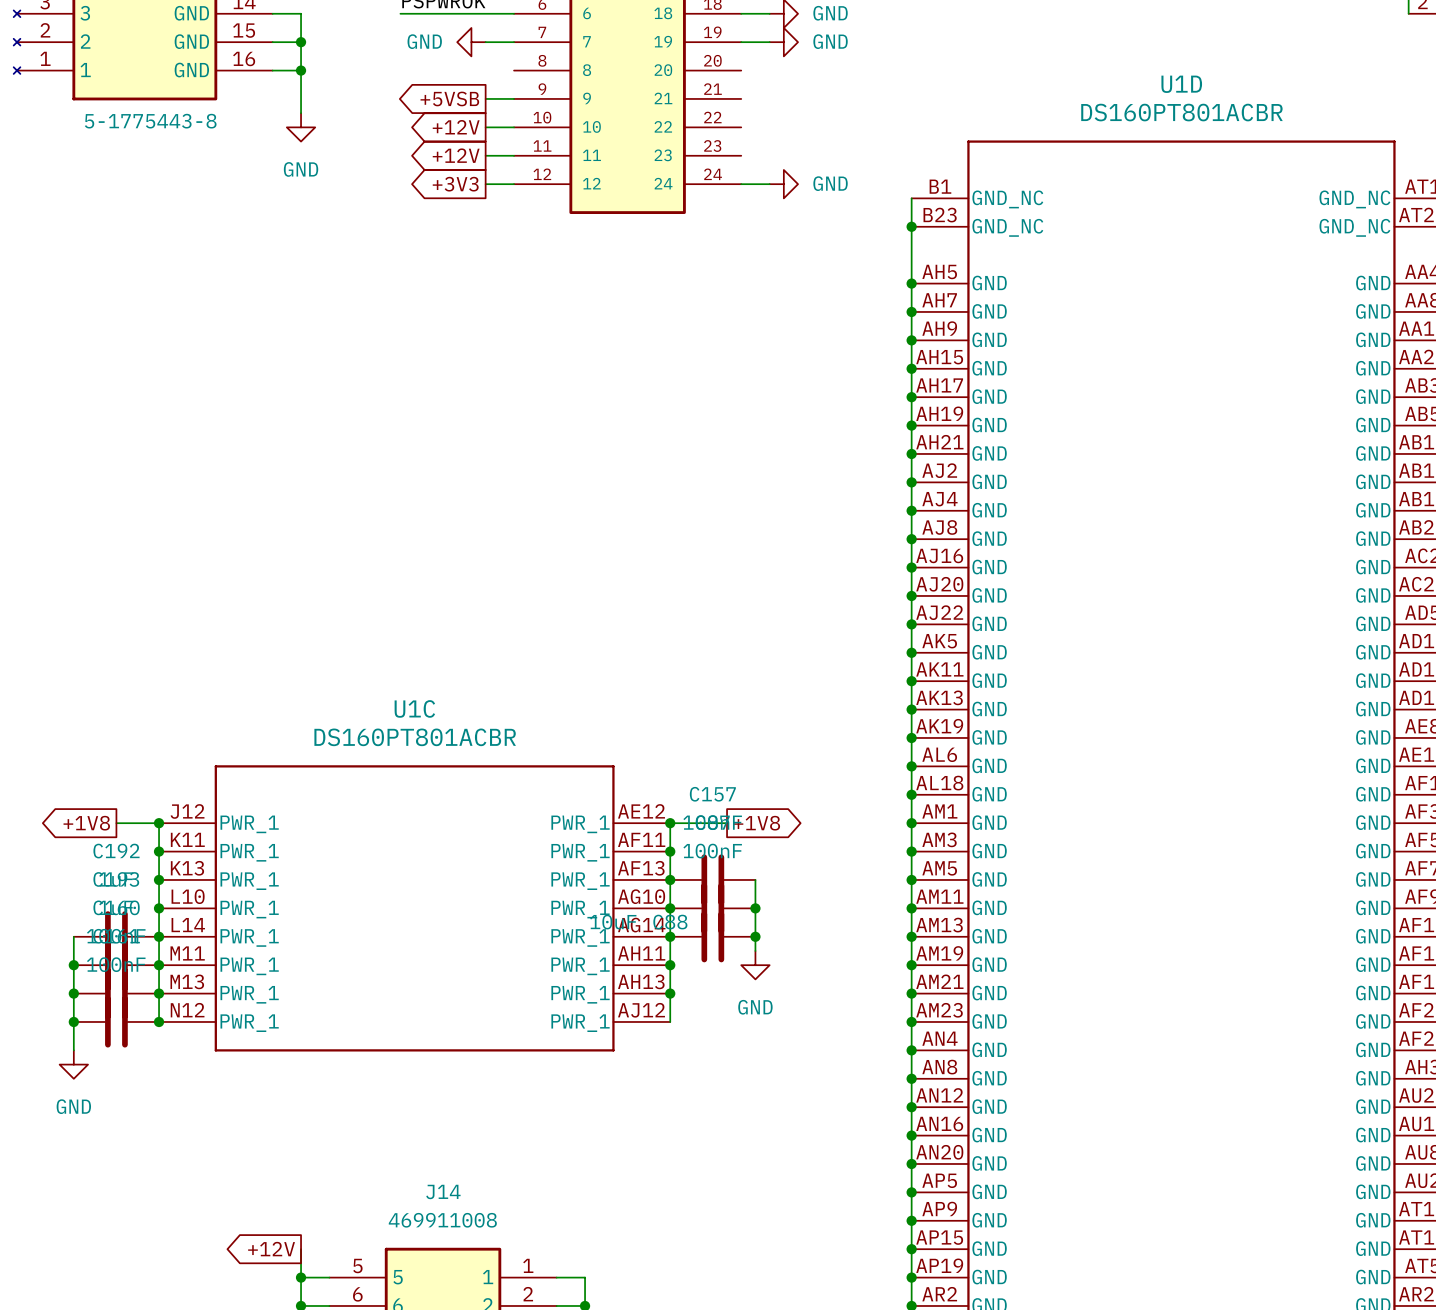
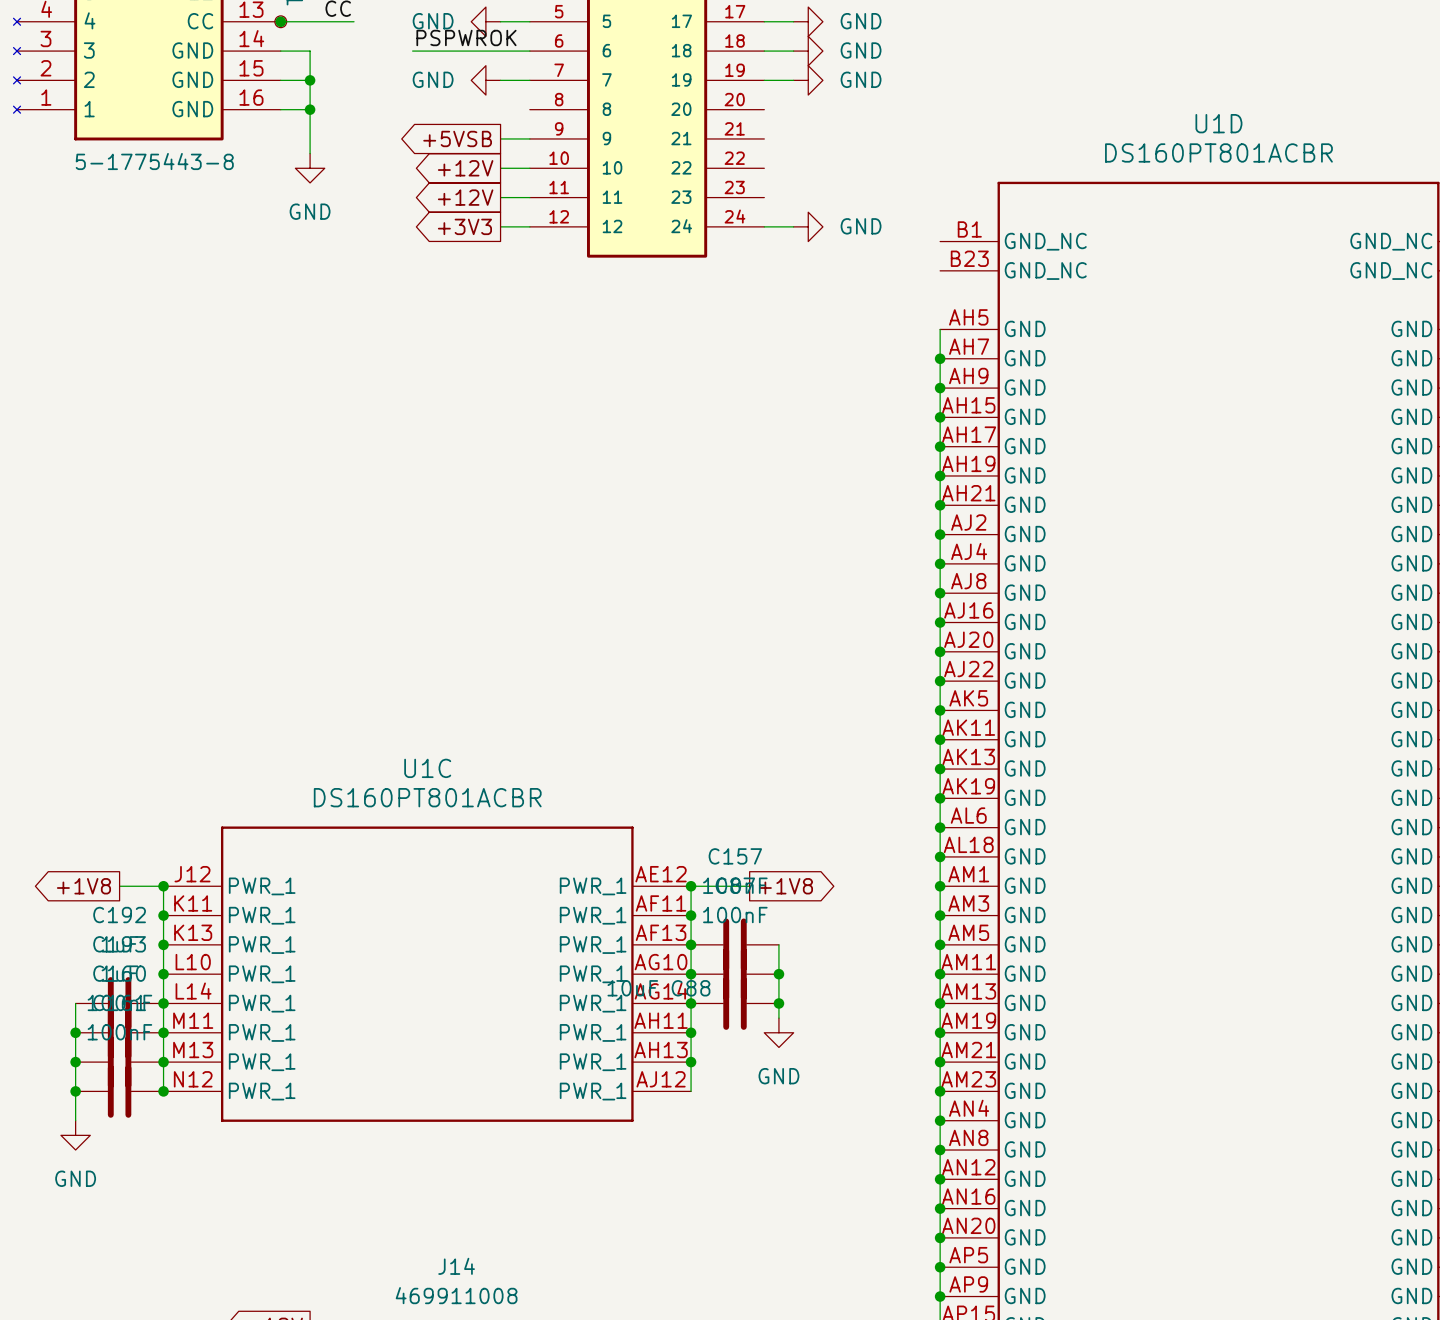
wire: (911, 198) (911, 283) -> none
junction: (911, 226) -> none
junction: (911, 283) -> none

